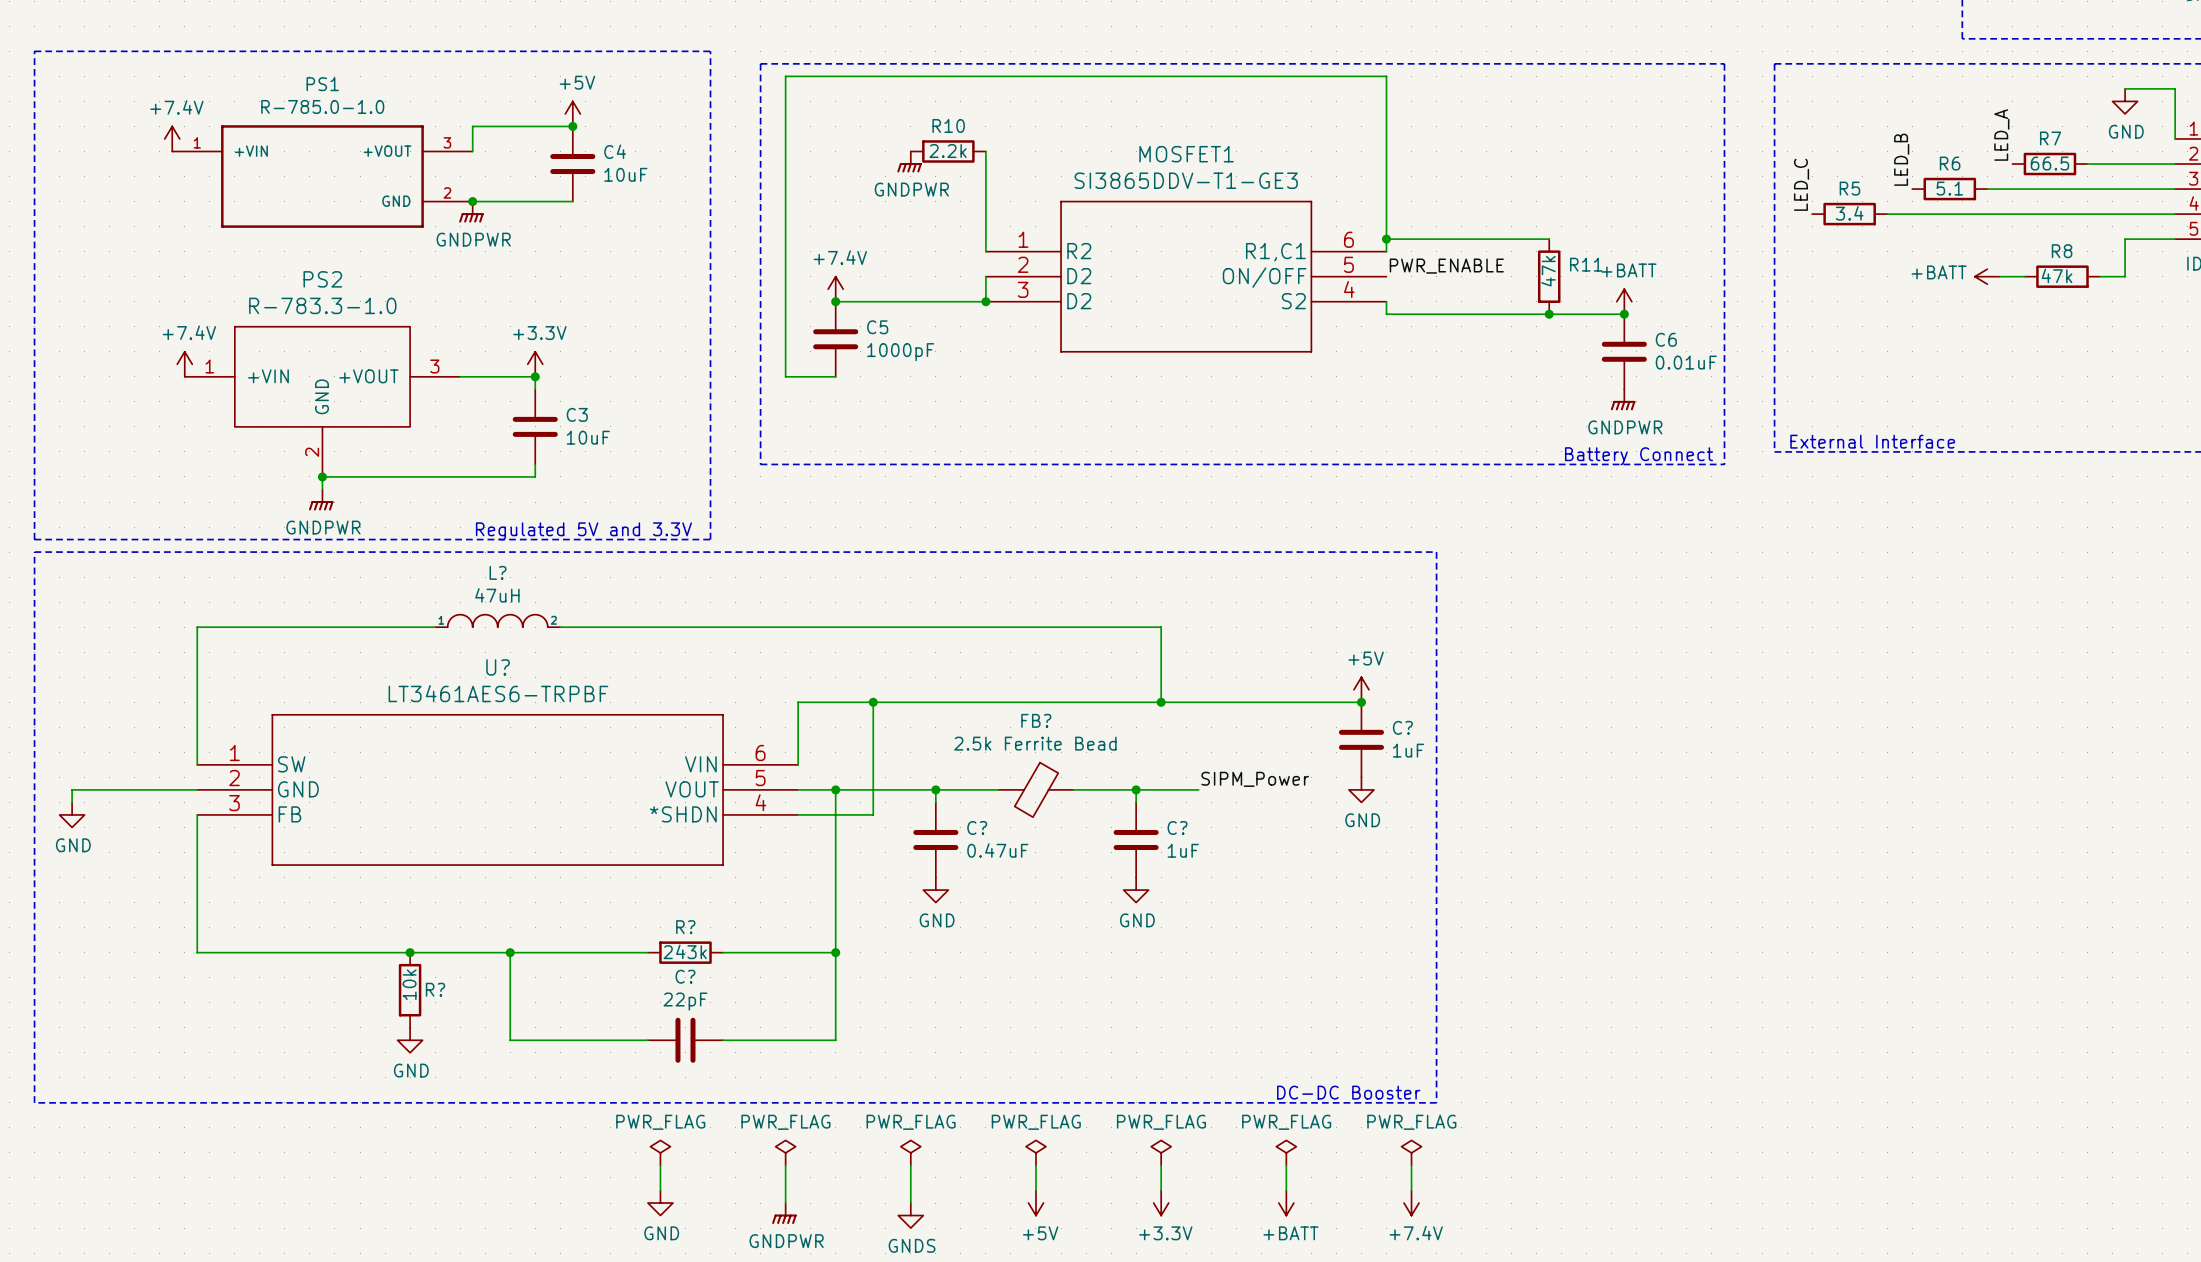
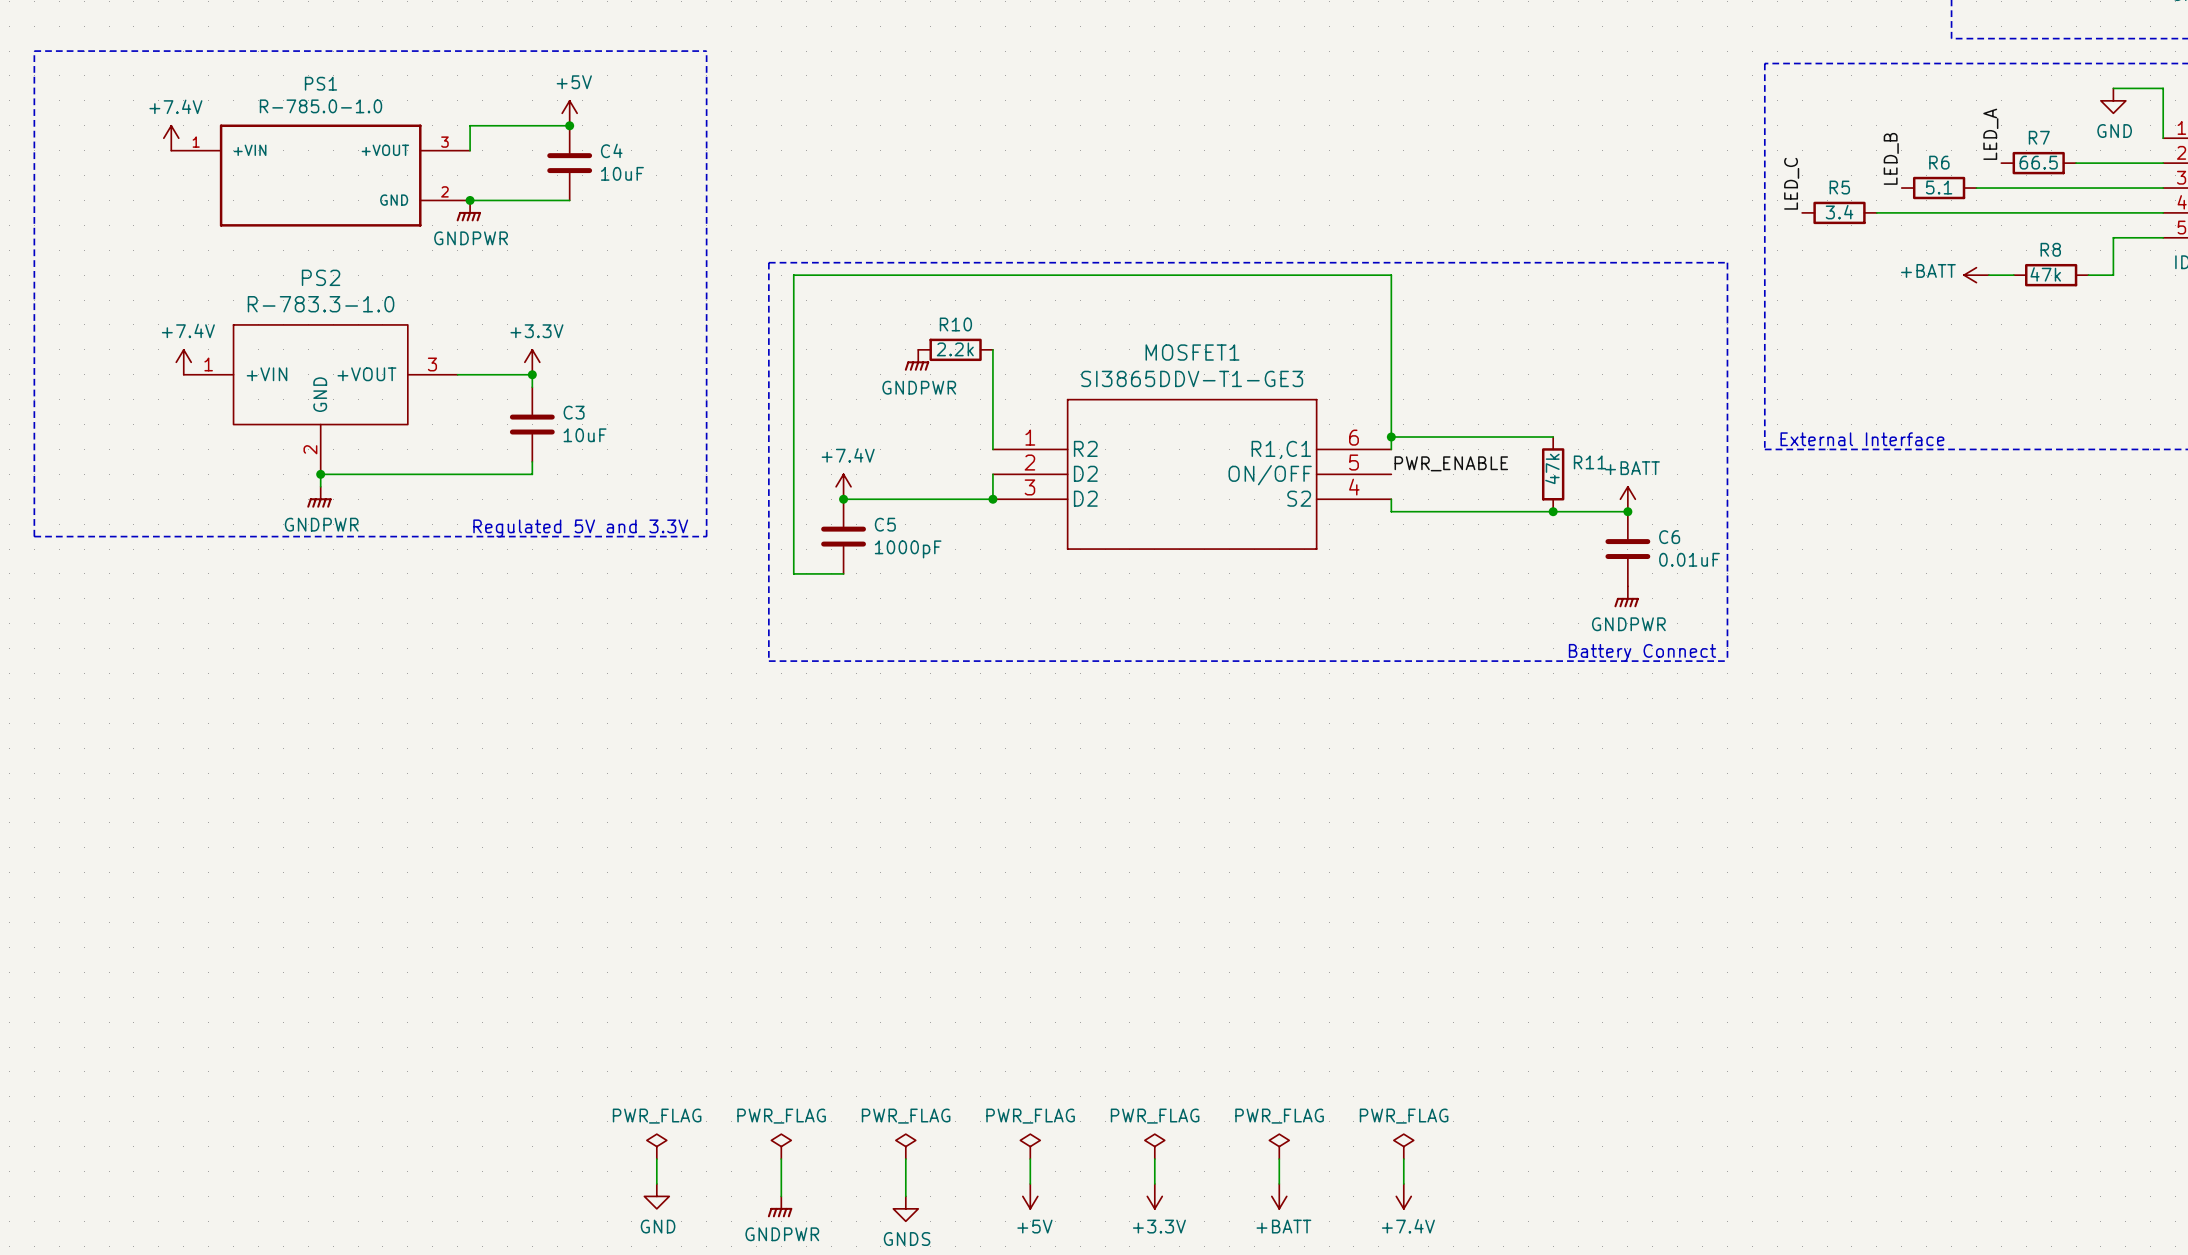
line: (760, 63) (760, 464) (1724, 464) (1724, 63) (760, 63) -> (768, 262) (768, 661) (1727, 661) (1727, 262) (768, 262)
R10 position: (948, 151) -> (955, 349)
wire: (985, 151) (985, 251) -> (992, 349) (992, 449)
power symbol position: GNDPWR (909, 162) -> GNDPWR (917, 360)
wire: (1386, 239) (1549, 239) -> (1391, 437) (1553, 437)
junction: (1386, 239) -> none
wire: (1386, 251) (1386, 76) (785, 76) (785, 376) (835, 376) -> (1391, 449) (1391, 275) (793, 275) (793, 573) (843, 573)
label position: PWR_ENABLE (1446, 266) -> PWR_ENABLE (1451, 463)
wire: (985, 276) (985, 301) (835, 301) -> (992, 474) (992, 499) (843, 499)
MOSFET1 position: (1186, 276) -> (1192, 474)
R11 position: (1549, 276) -> (1553, 474)
power symbol position: +7.4V (835, 289) -> +7.4V (843, 486)
junction: (835, 301) -> none
junction: (985, 301) -> none
wire: (1386, 301) (1386, 314) (1624, 314) -> (1391, 499) (1391, 511) (1627, 511)
power symbol position: +BATT (1624, 301) -> +BATT (1627, 499)
junction: (1549, 314) -> none
junction: (1624, 314) -> none
C5 position: (835, 339) -> (843, 536)
C6 position: (1624, 351) -> (1627, 549)
power symbol position: GNDPWR (1623, 399) -> GNDPWR (1626, 596)
junction: none -> (1391, 437)
text position: Battery Connect (1639, 456) -> Battery Connect (1642, 652)
junction: none -> (843, 499)
junction: none -> (992, 499)
junction: none -> (1553, 511)
junction: none -> (1627, 511)
line: (34, 552) (34, 1102) (1436, 1102) (1436, 552) (34, 552) -> none
L?: 47uH (497, 620) -> none
wire: (435, 627) (197, 627) (197, 764) -> none
wire: (560, 627) (1161, 627) (1161, 702) -> none
power symbol: +5V (1361, 689) -> none
wire: (873, 702) (873, 814) (798, 814) -> none
junction: (873, 702) -> none
junction: (1161, 702) -> none
wire: (1361, 702) (798, 702) (798, 764) -> none
junction: (1361, 702) -> none
C?: 1uF (1361, 739) -> none
label: SIPM_Power (1255, 779) -> none
wire: (197, 789) (72, 789) (72, 802) -> none
U?: LT3461AES6-TRPBF (497, 789) -> none
wire: (798, 789) (998, 789) -> none
wire: (835, 789) (835, 1040) (723, 1040) -> none
junction: (835, 789) -> none
wire: (935, 789) (935, 802) -> none
junction: (935, 789) -> none
FB?: 2.5k Ferrite Bead (1035, 789) -> none
wire: (1073, 789) (1198, 789) -> none
wire: (1136, 789) (1136, 802) -> none
junction: (1136, 789) -> none
power symbol: GND (1361, 789) -> none
power symbol: GND (72, 814) -> none
wire: (197, 814) (197, 952) (647, 952) -> none
C?: 0.47uF (935, 839) -> none
C?: 1uF (1136, 839) -> none
power symbol: GND (935, 890) -> none
power symbol: GND (1136, 890) -> none
junction: (410, 952) -> none
wire: (510, 952) (510, 1040) (647, 1040) -> none
junction: (510, 952) -> none
R?: 243k (685, 952) -> none
wire: (723, 952) (835, 952) -> none
junction: (835, 952) -> none
R?: 10k (410, 990) -> none
power symbol: GND (410, 1040) -> none
C?: 22pF (685, 1040) -> none
text: DC-DC Booster (1348, 1092) -> none

